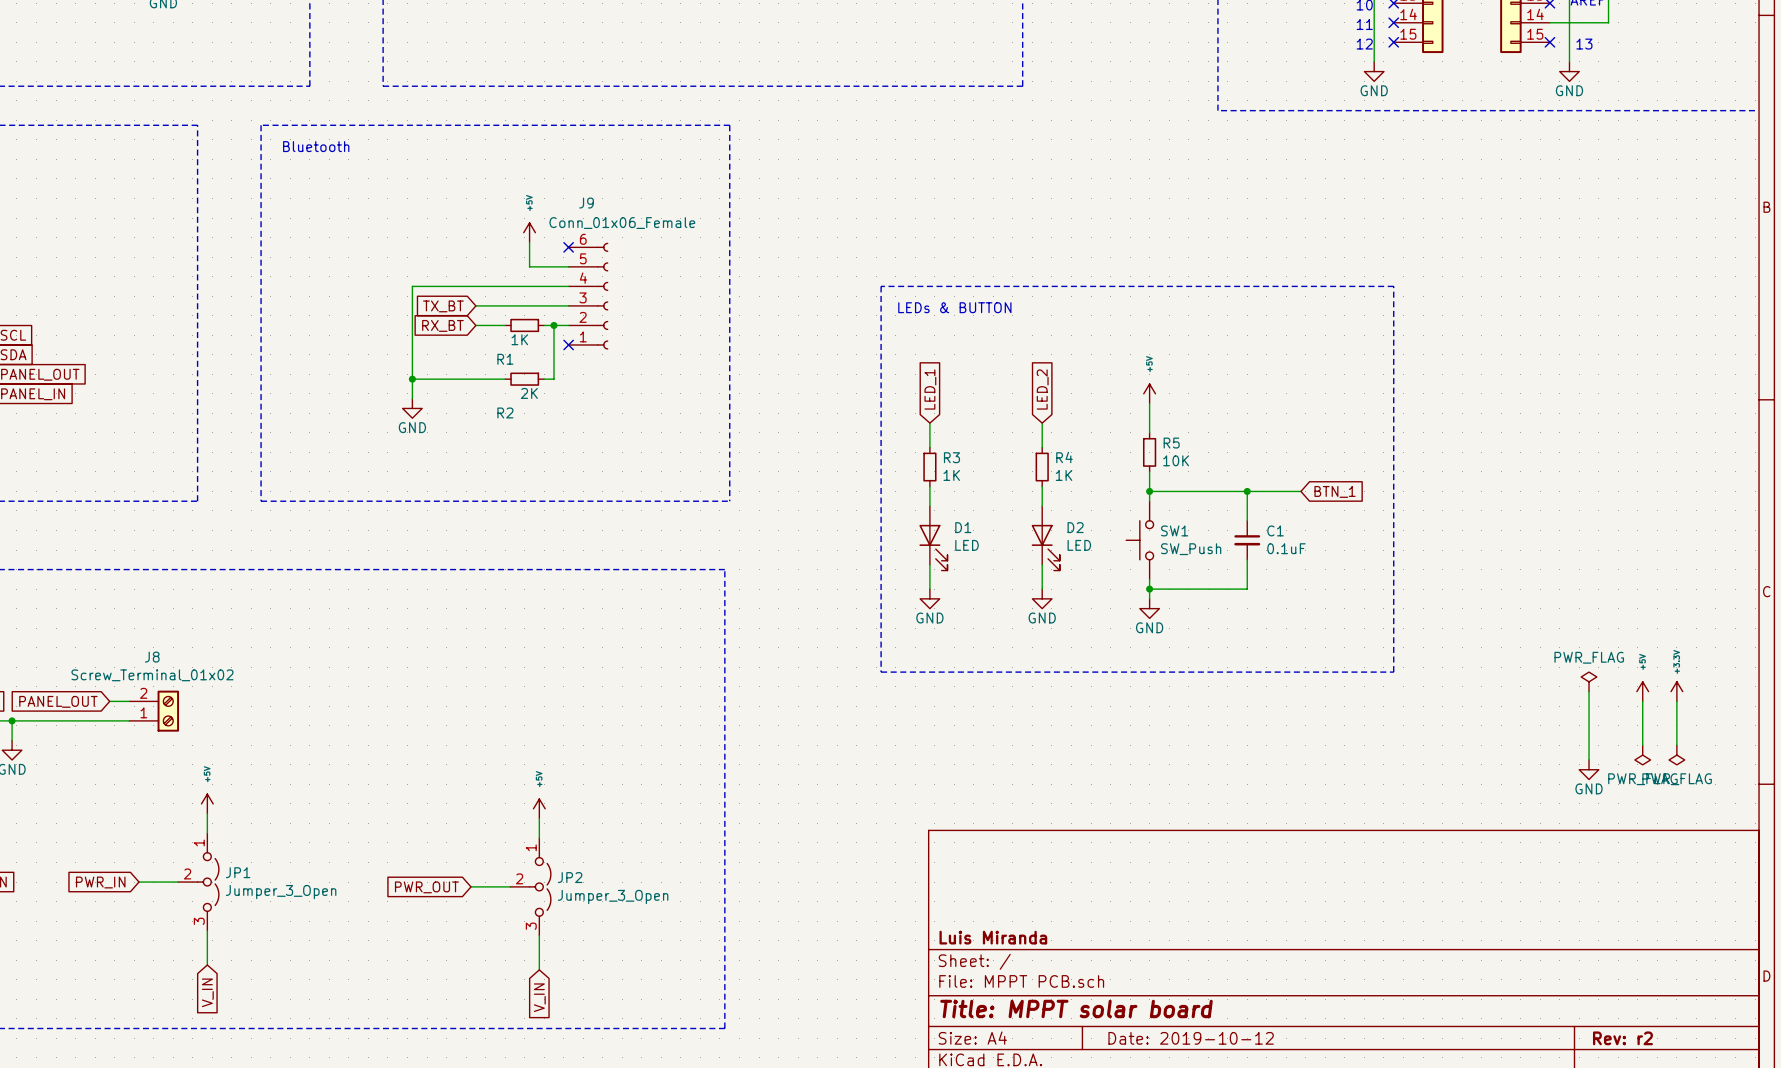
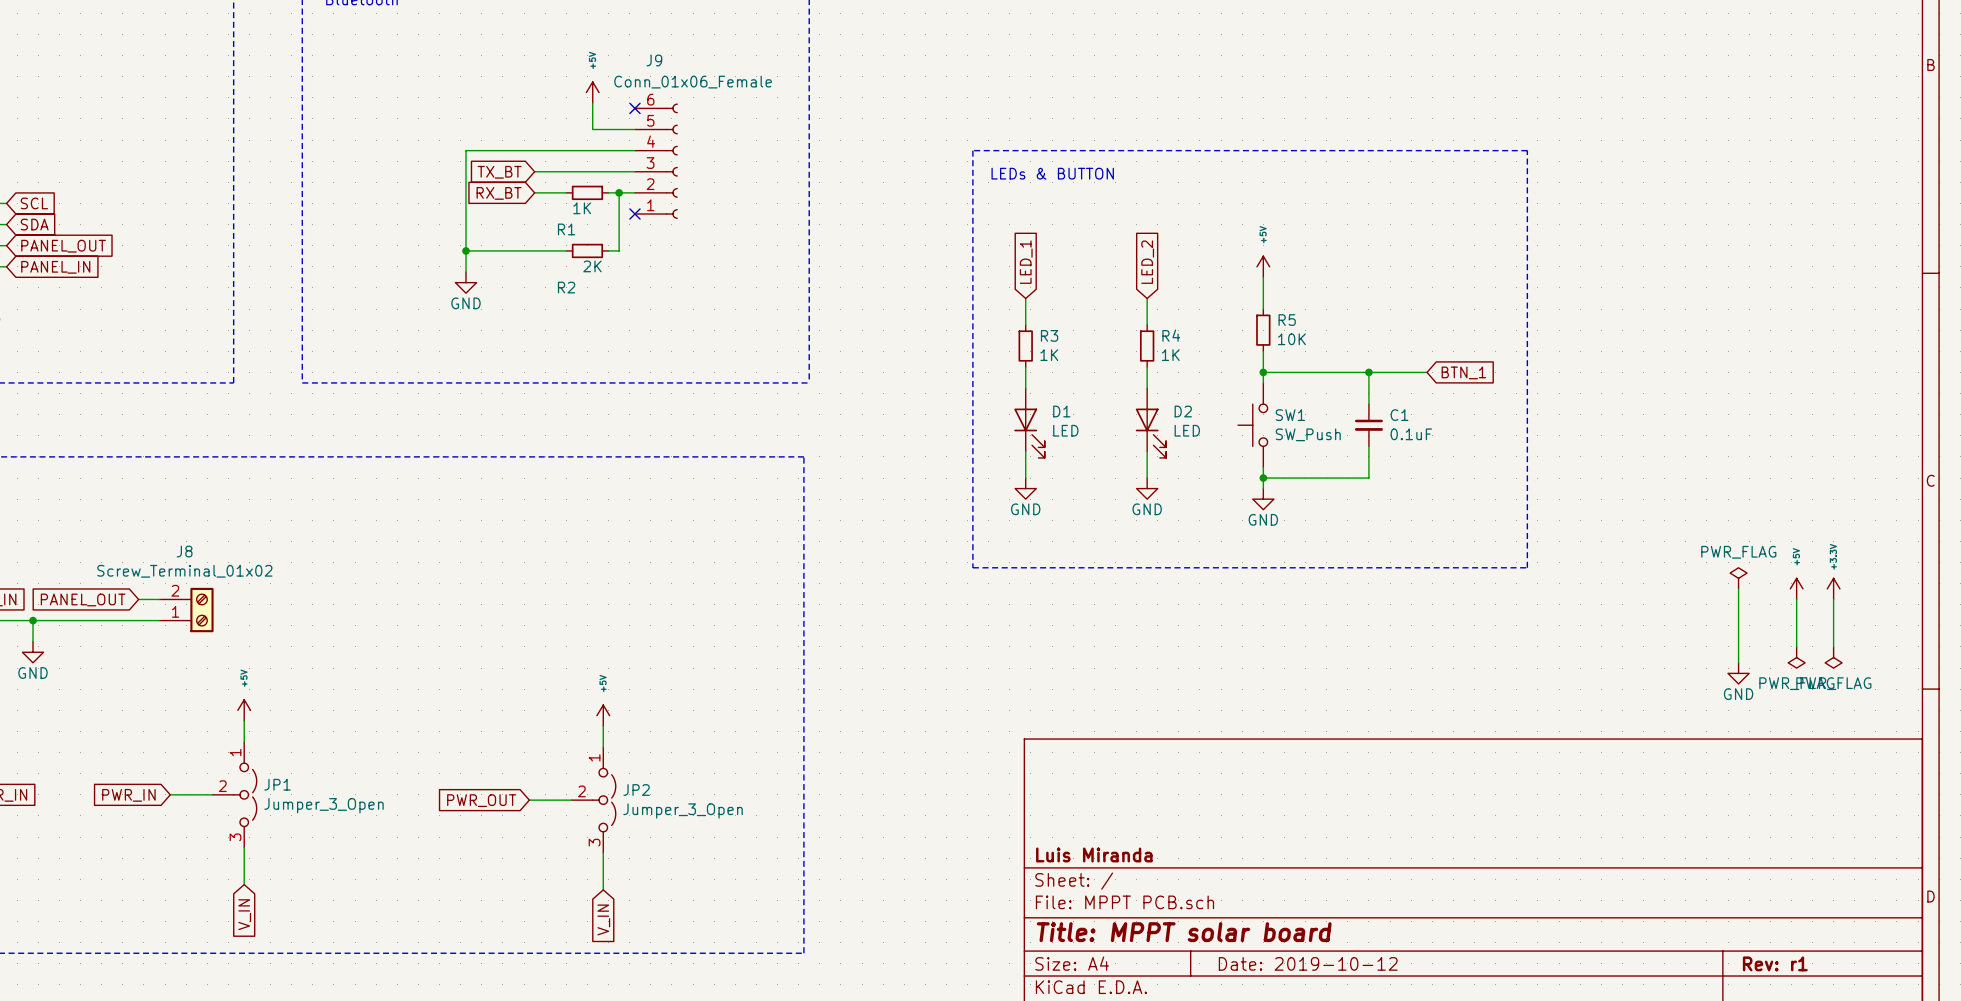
title block: Rev: r2 (1622, 1038) -> Rev: r1 (1775, 963)

